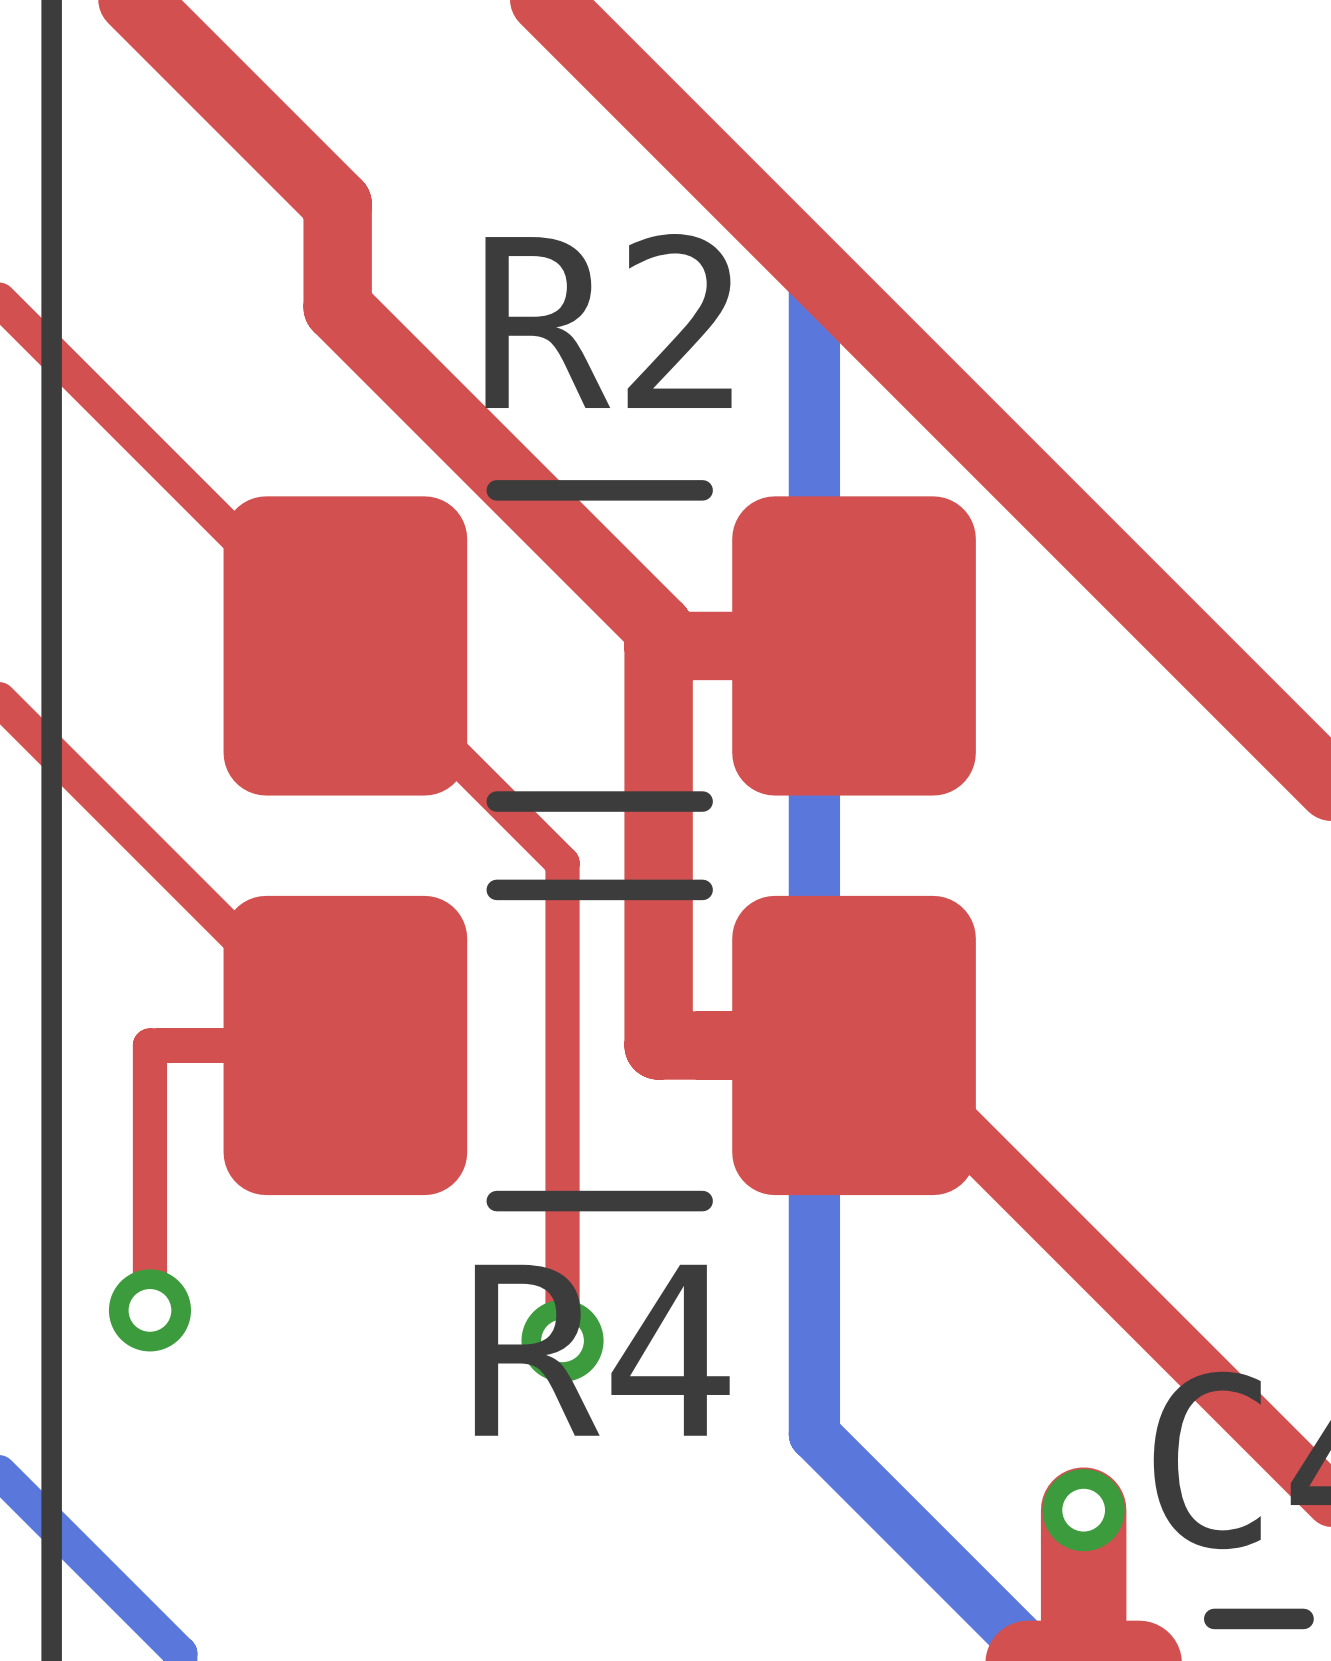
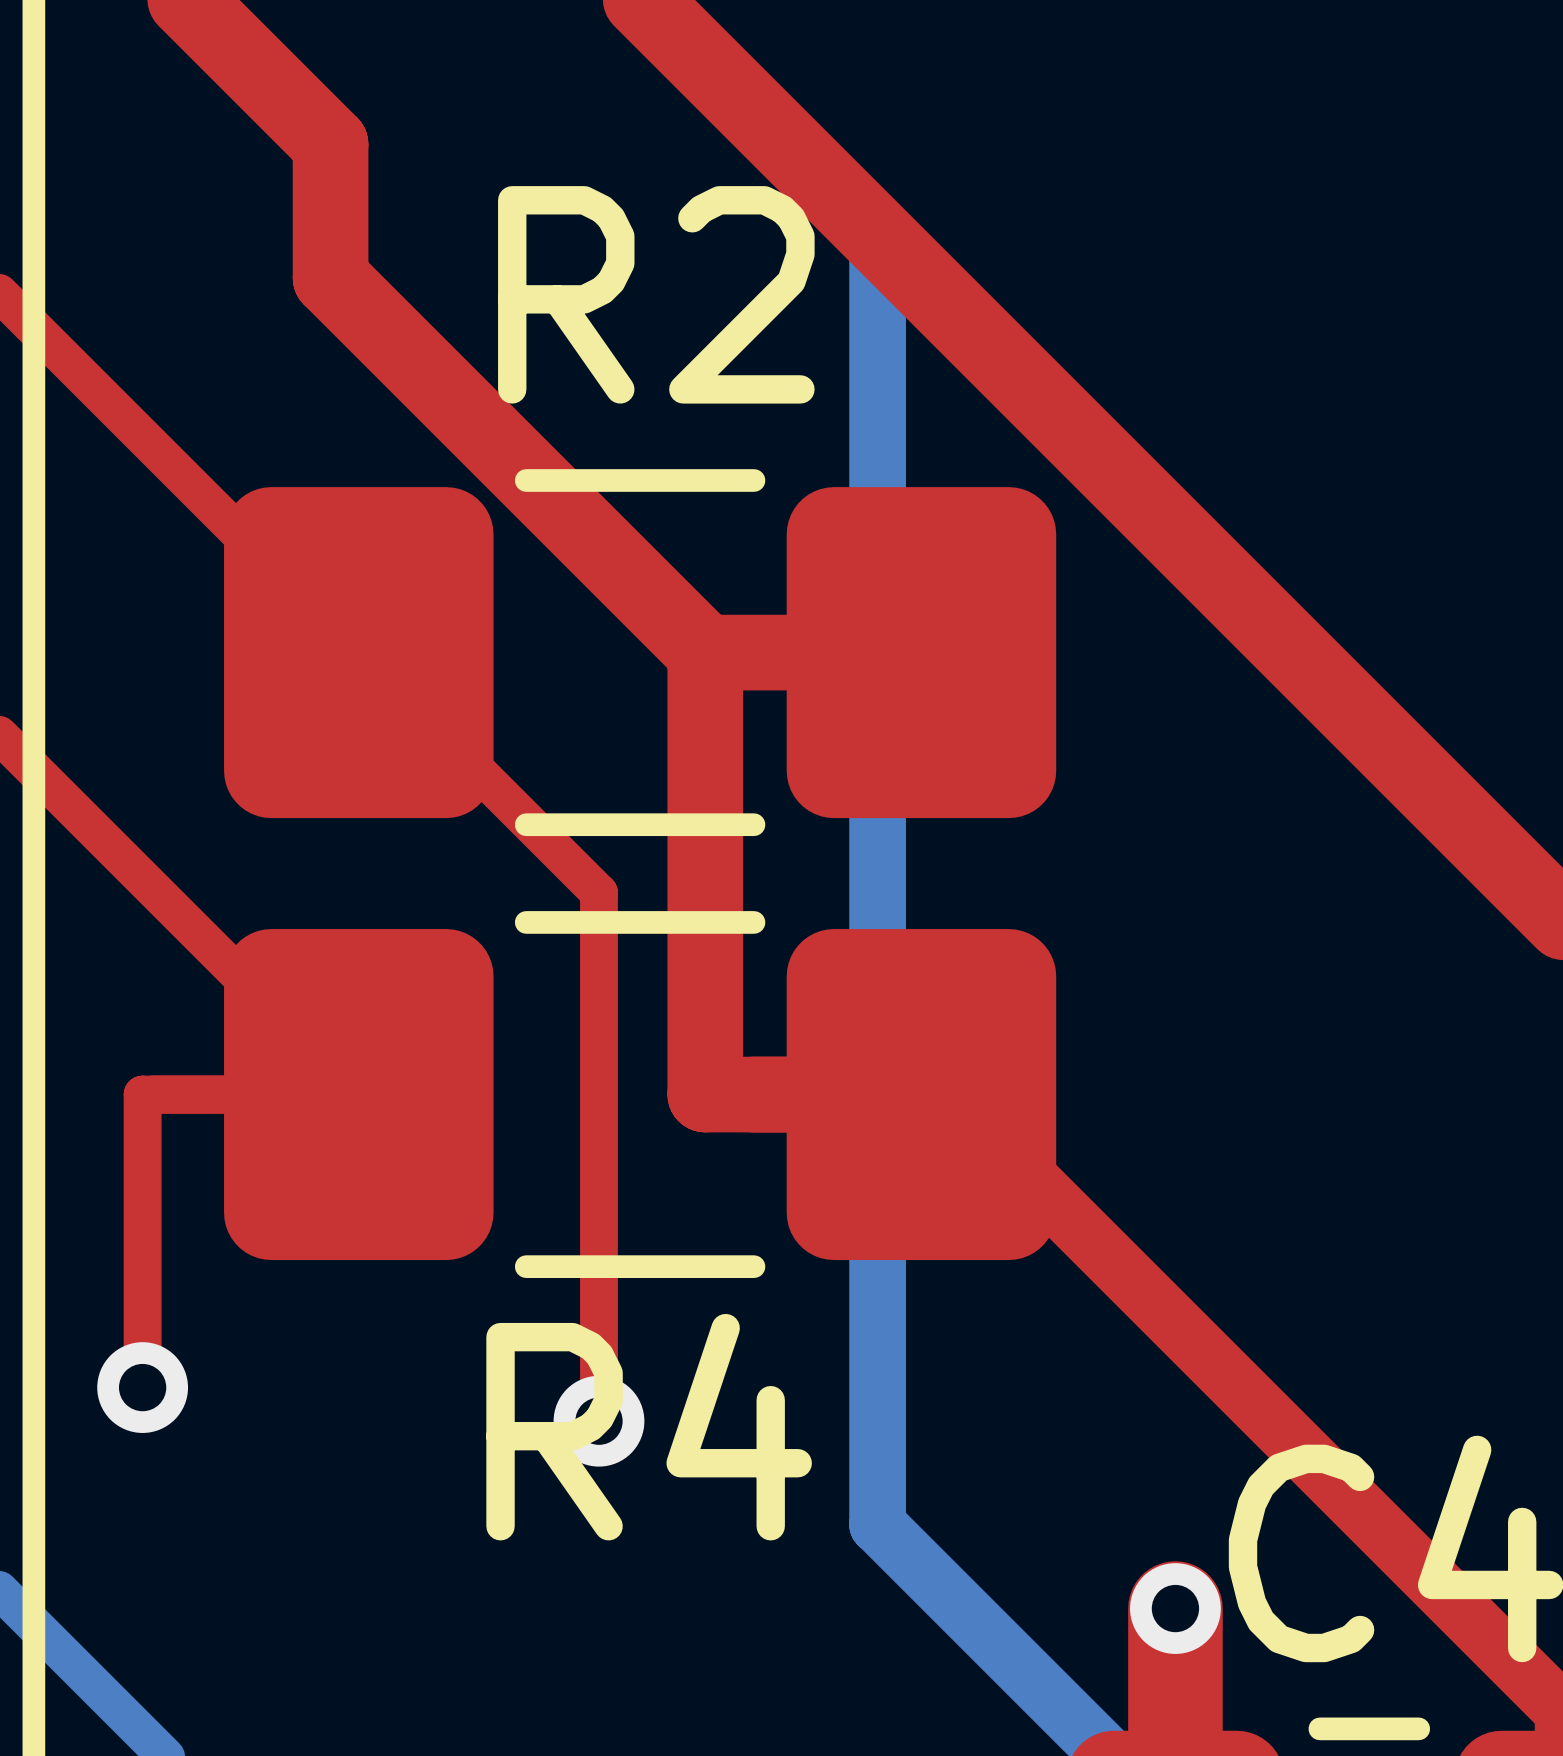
top track: (319, 186) (337, 204) (337, 307) (658, 628) (658, 645) -> (330, 144) (330, 277) (705, 652)

